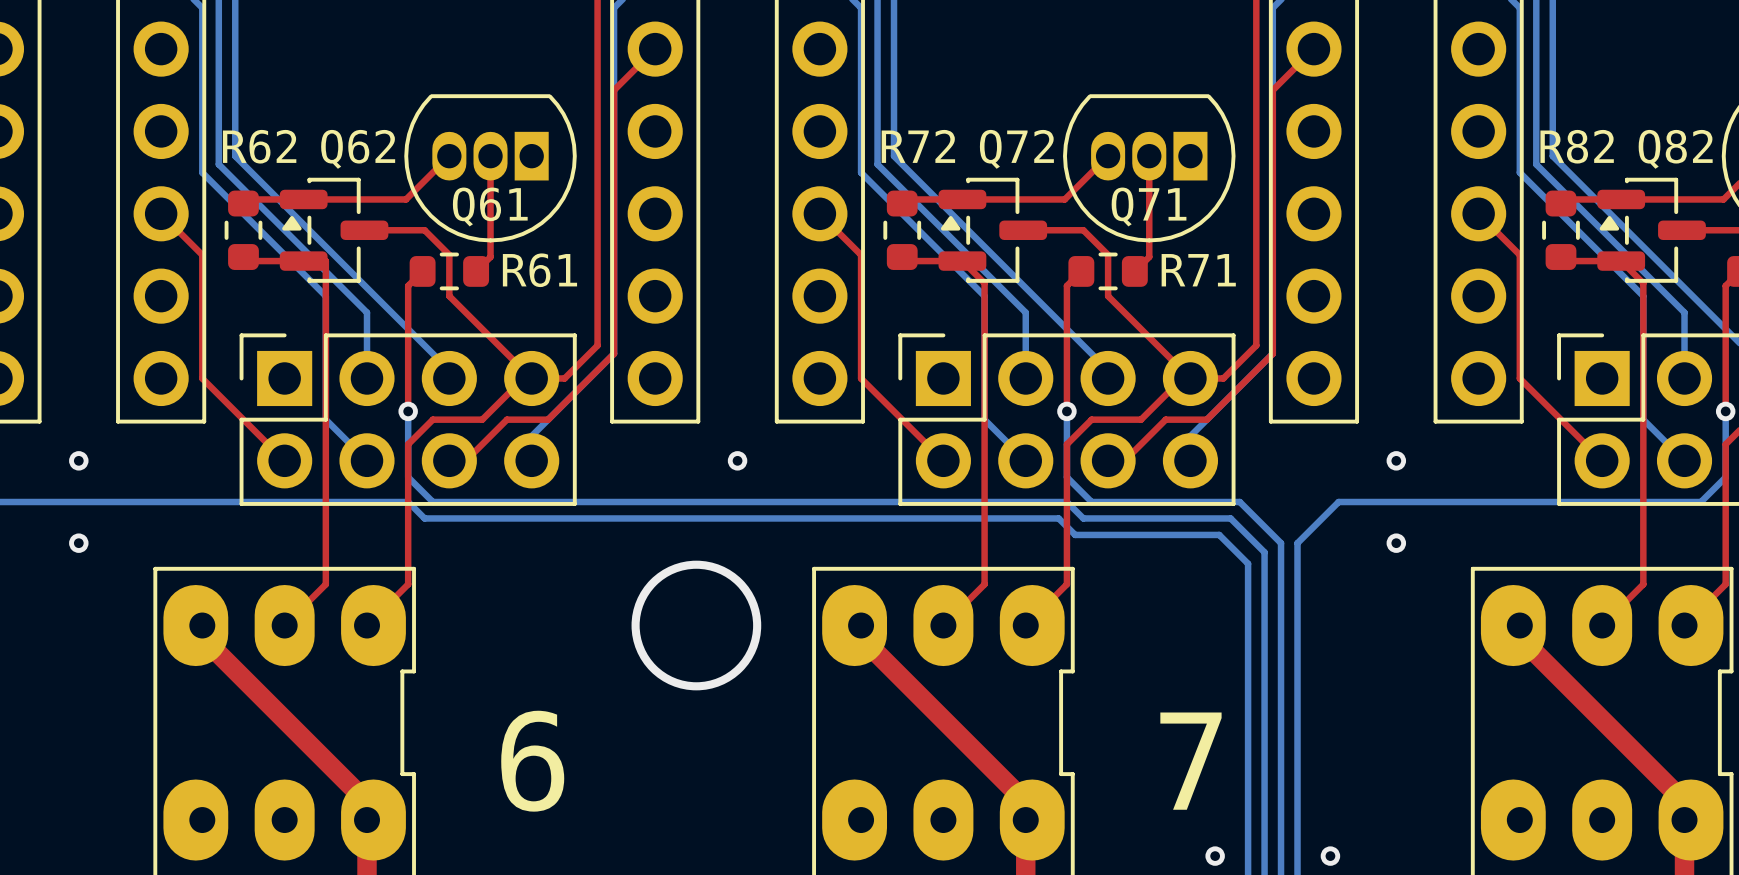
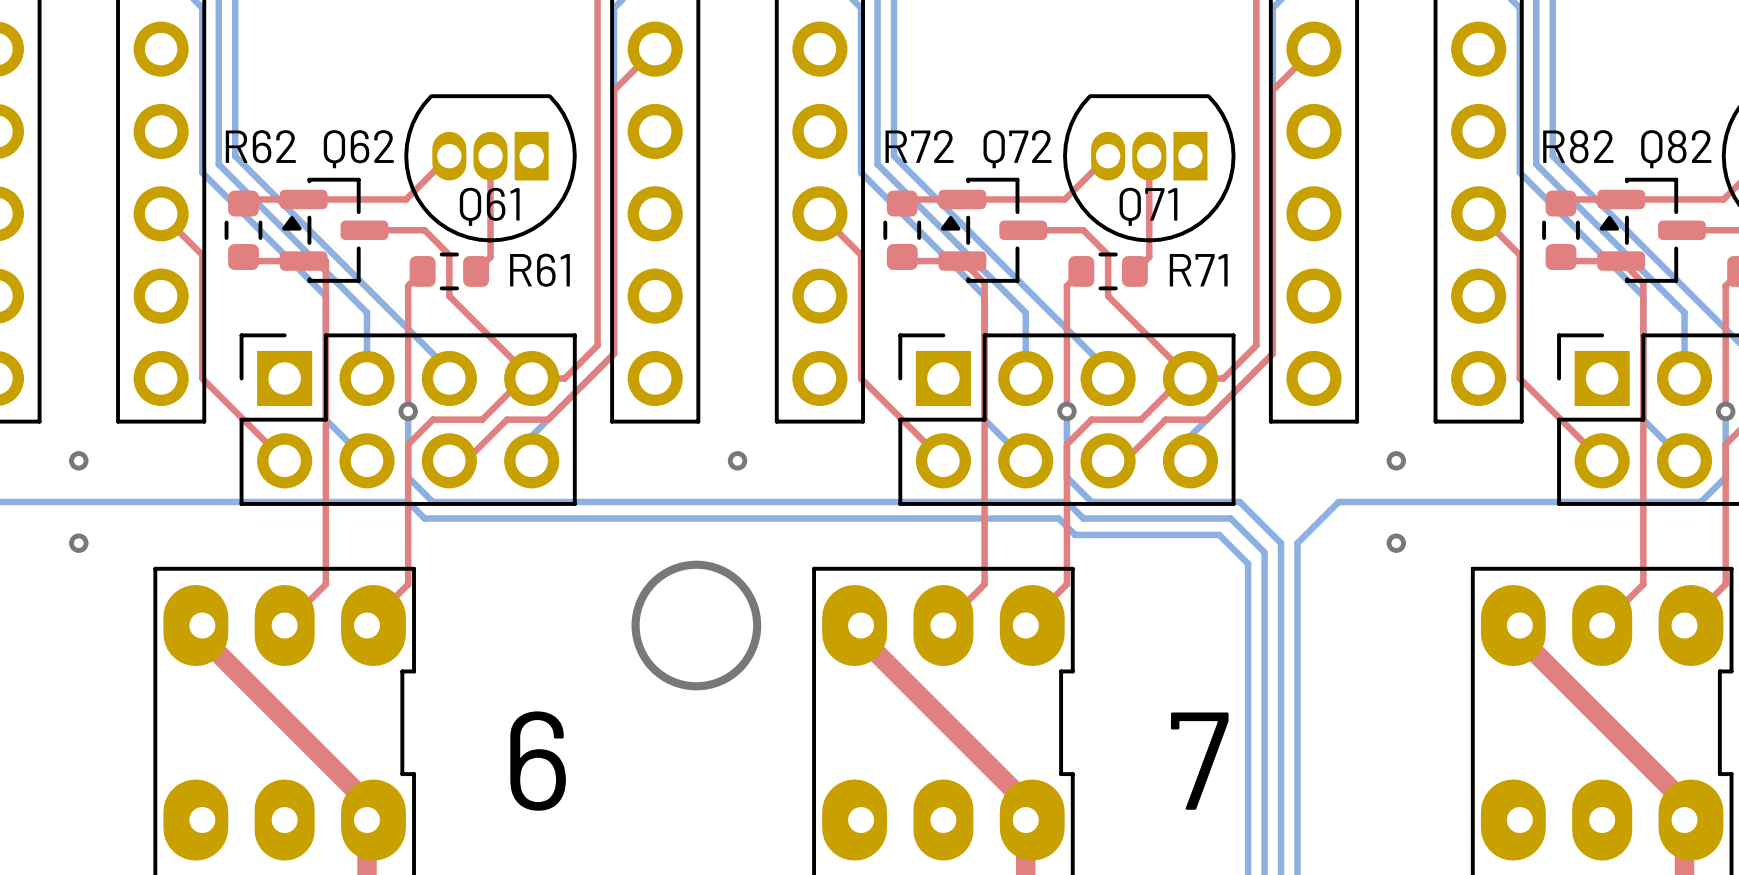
via: (1215, 856) -> none
via: (1330, 856) -> none

